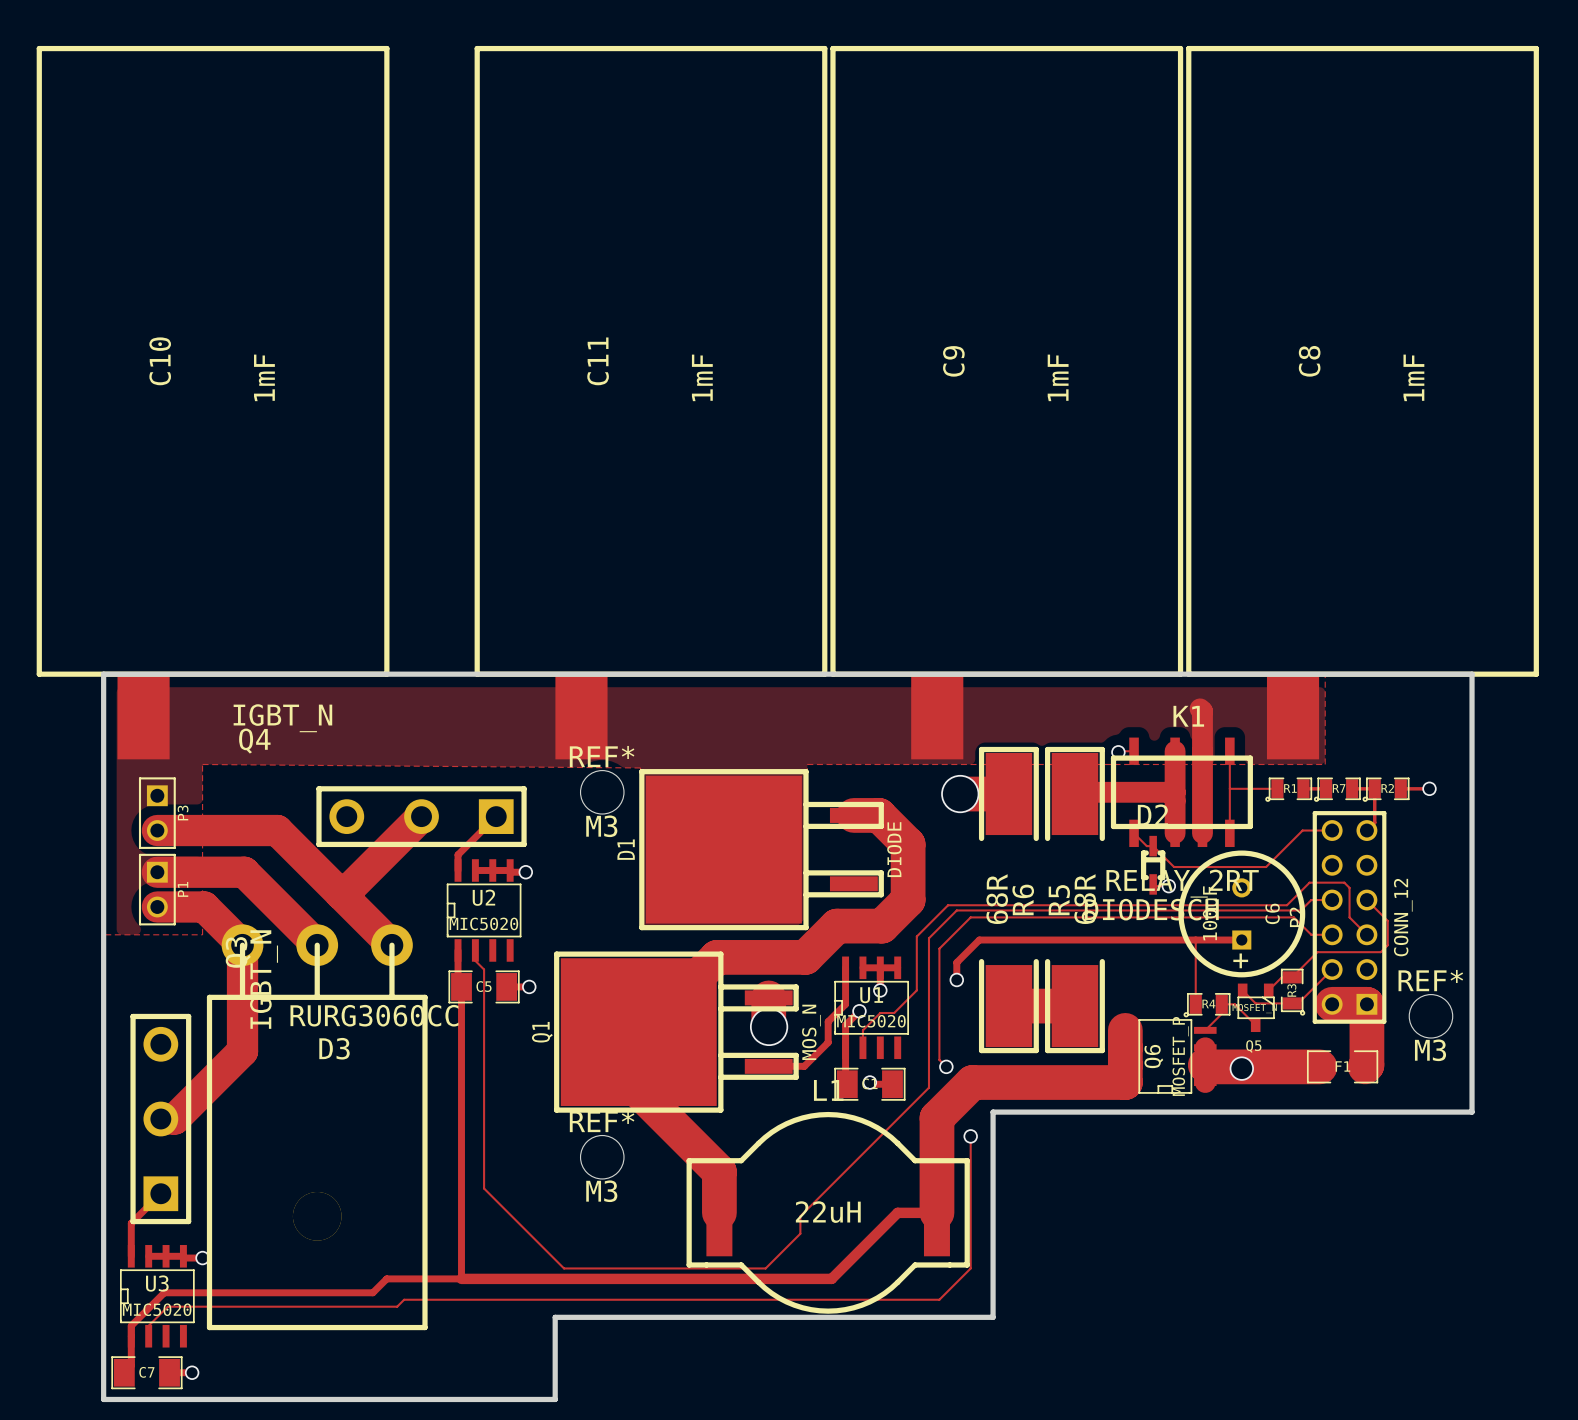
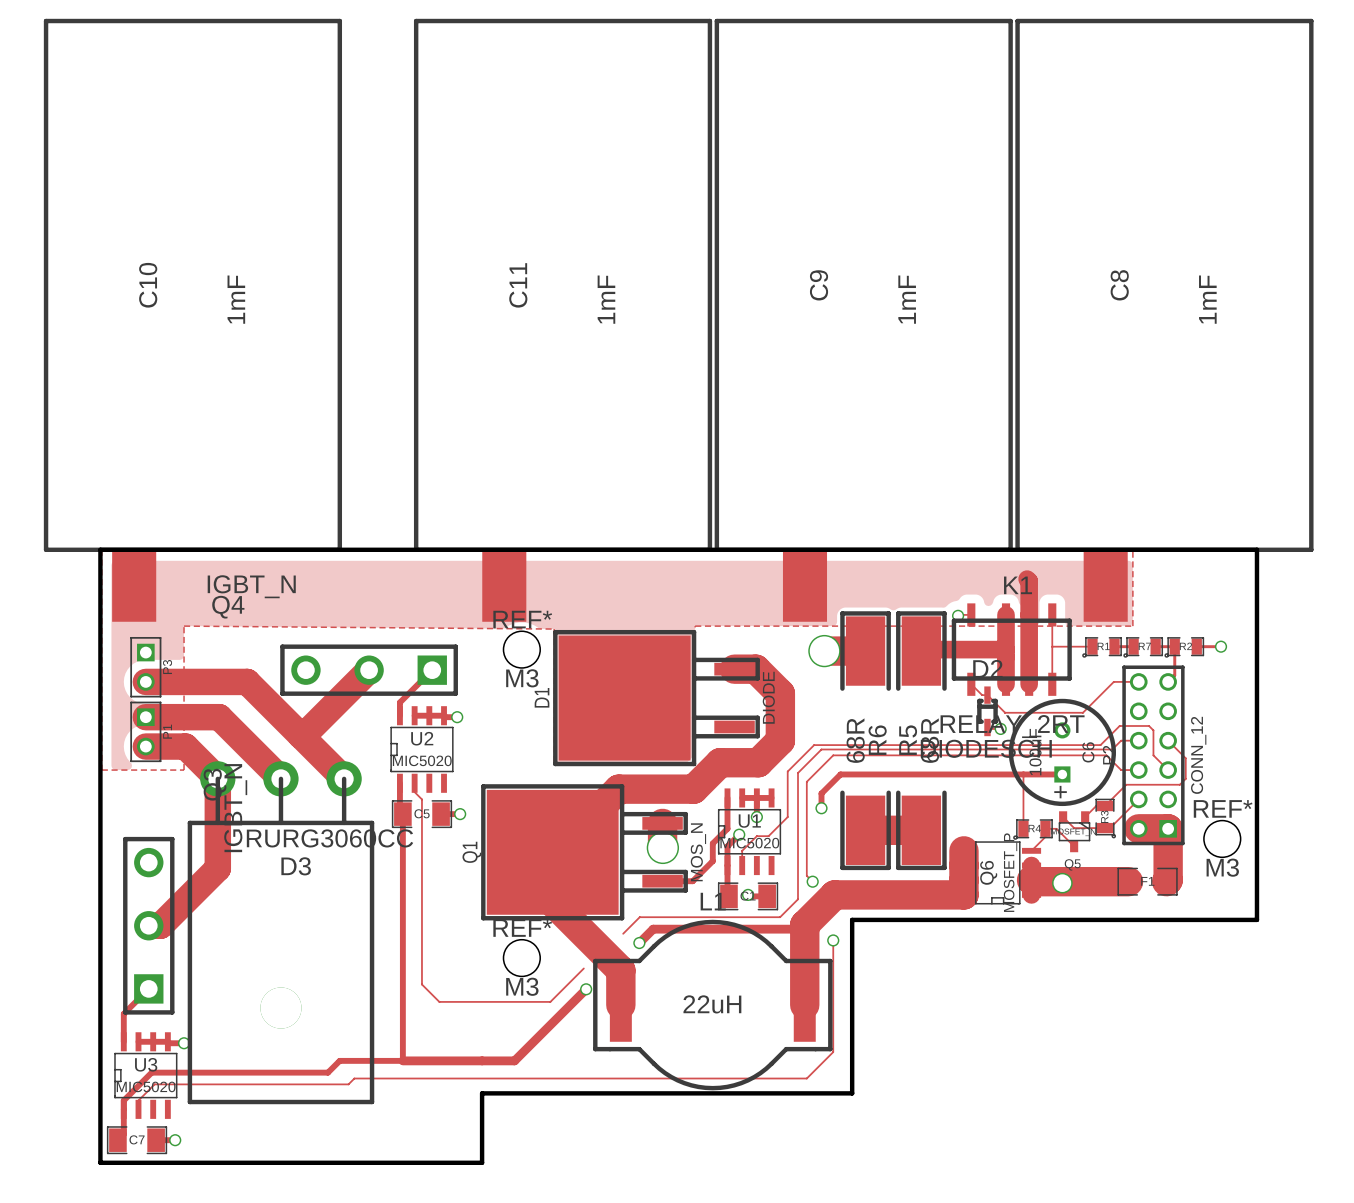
track: (907, 1108) (800, 1216) (800, 1233) (765, 1268) (564, 1268) (504, 1209) -> (780, 917) (639, 917) (623, 933)
track: none -> (804, 929) (653, 929) (639, 943)
via: none -> (639, 943)
track: none -> (583, 968) (550, 1001) (439, 1001)
via: none -> (586, 989)
track: (936, 1212) (897, 1212) (831, 1278) (593, 1278) -> (586, 989) (514, 1060)

